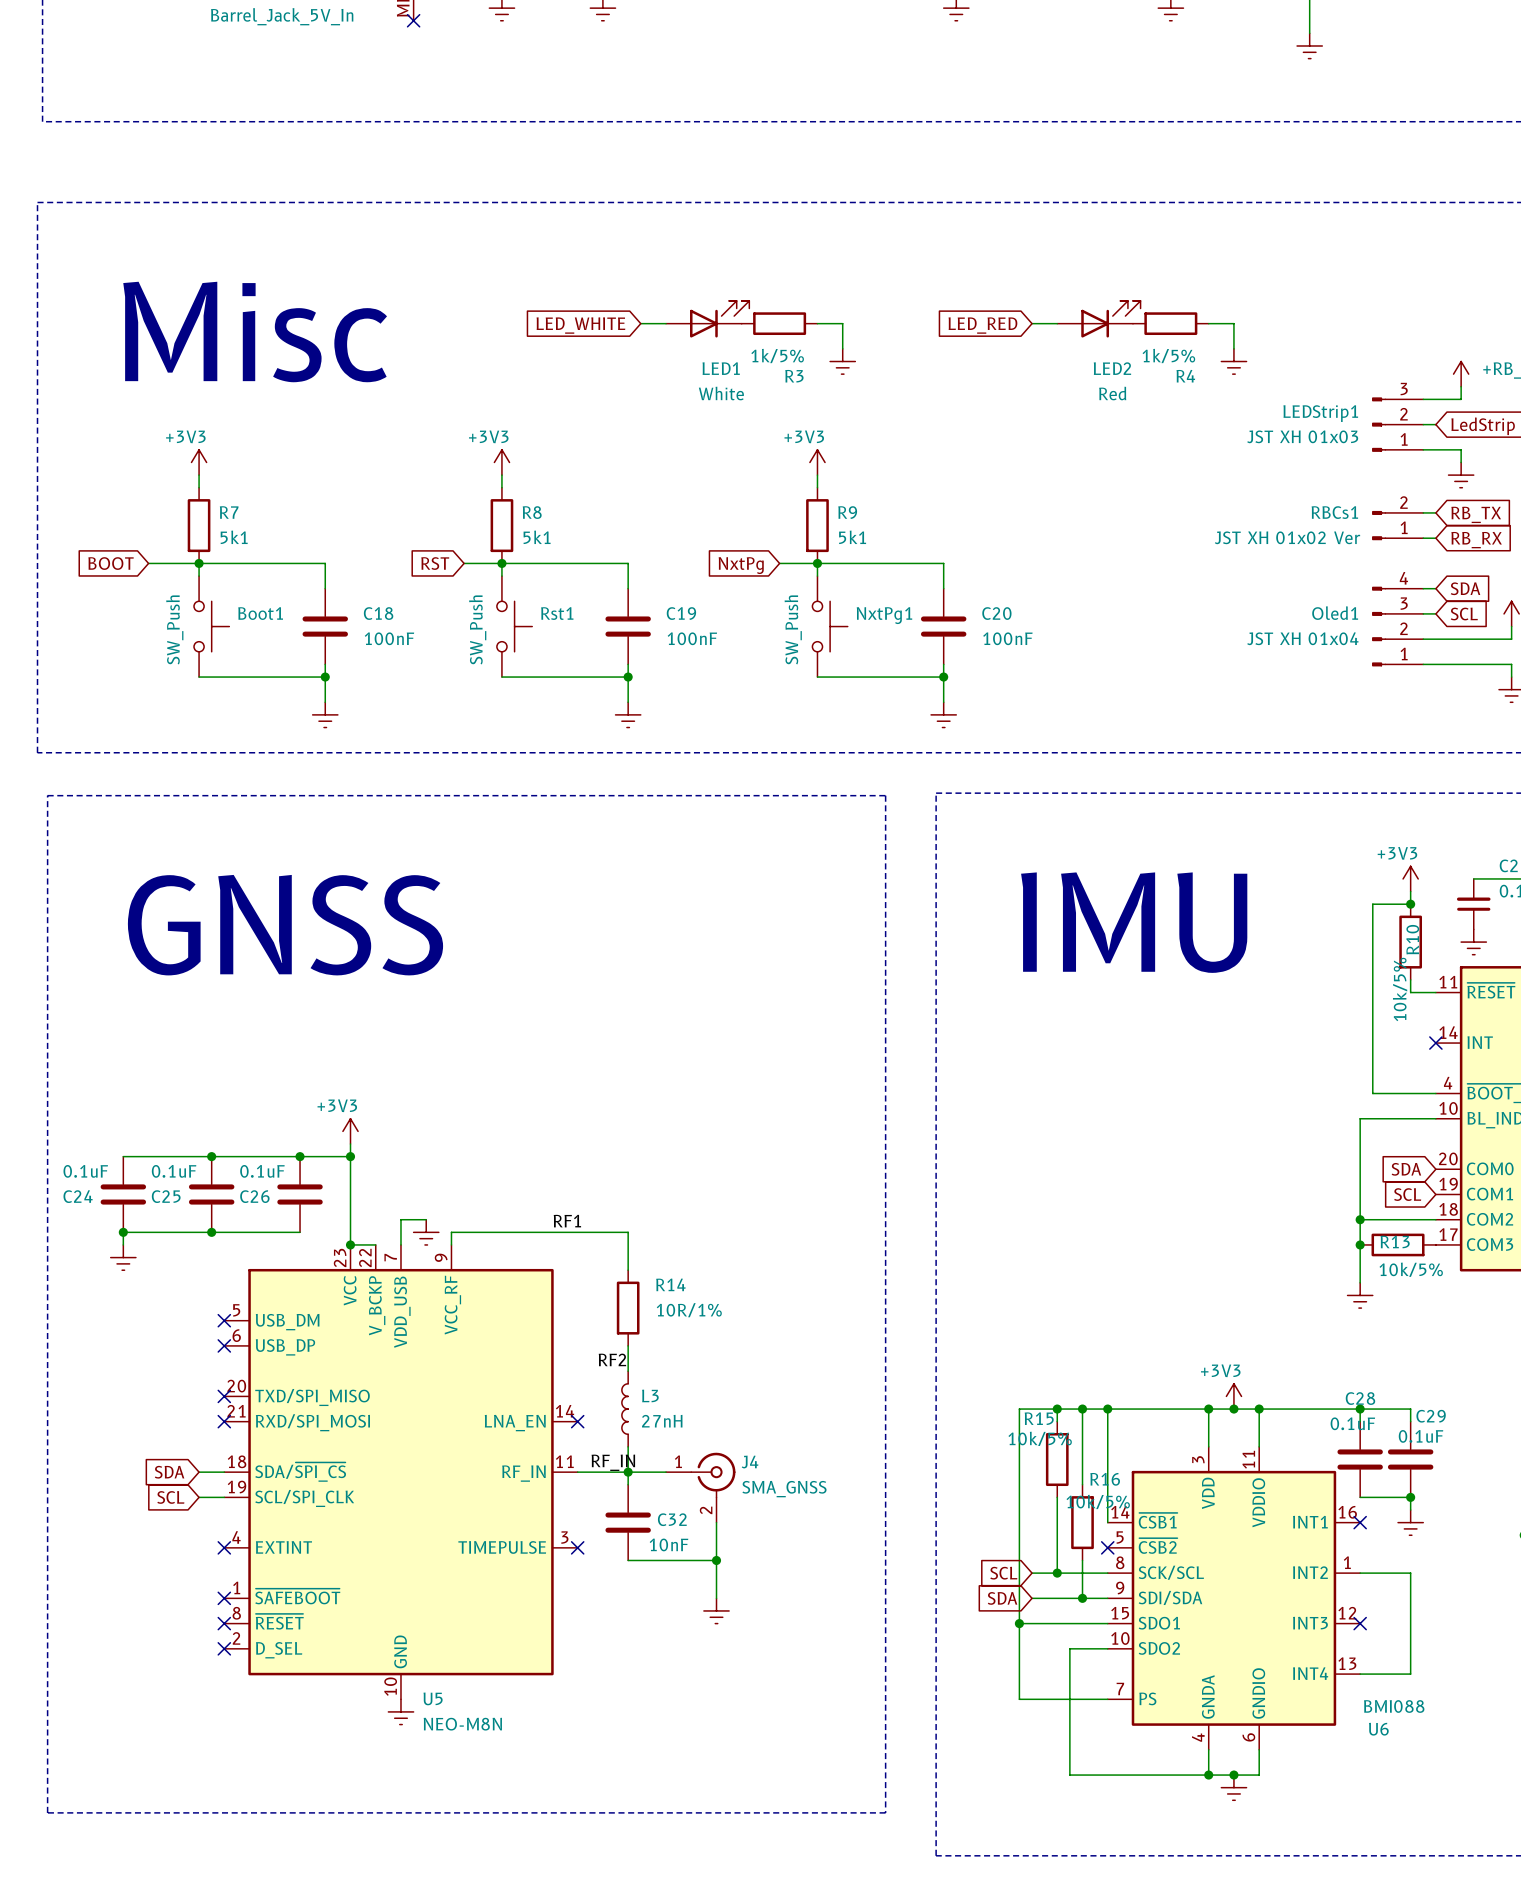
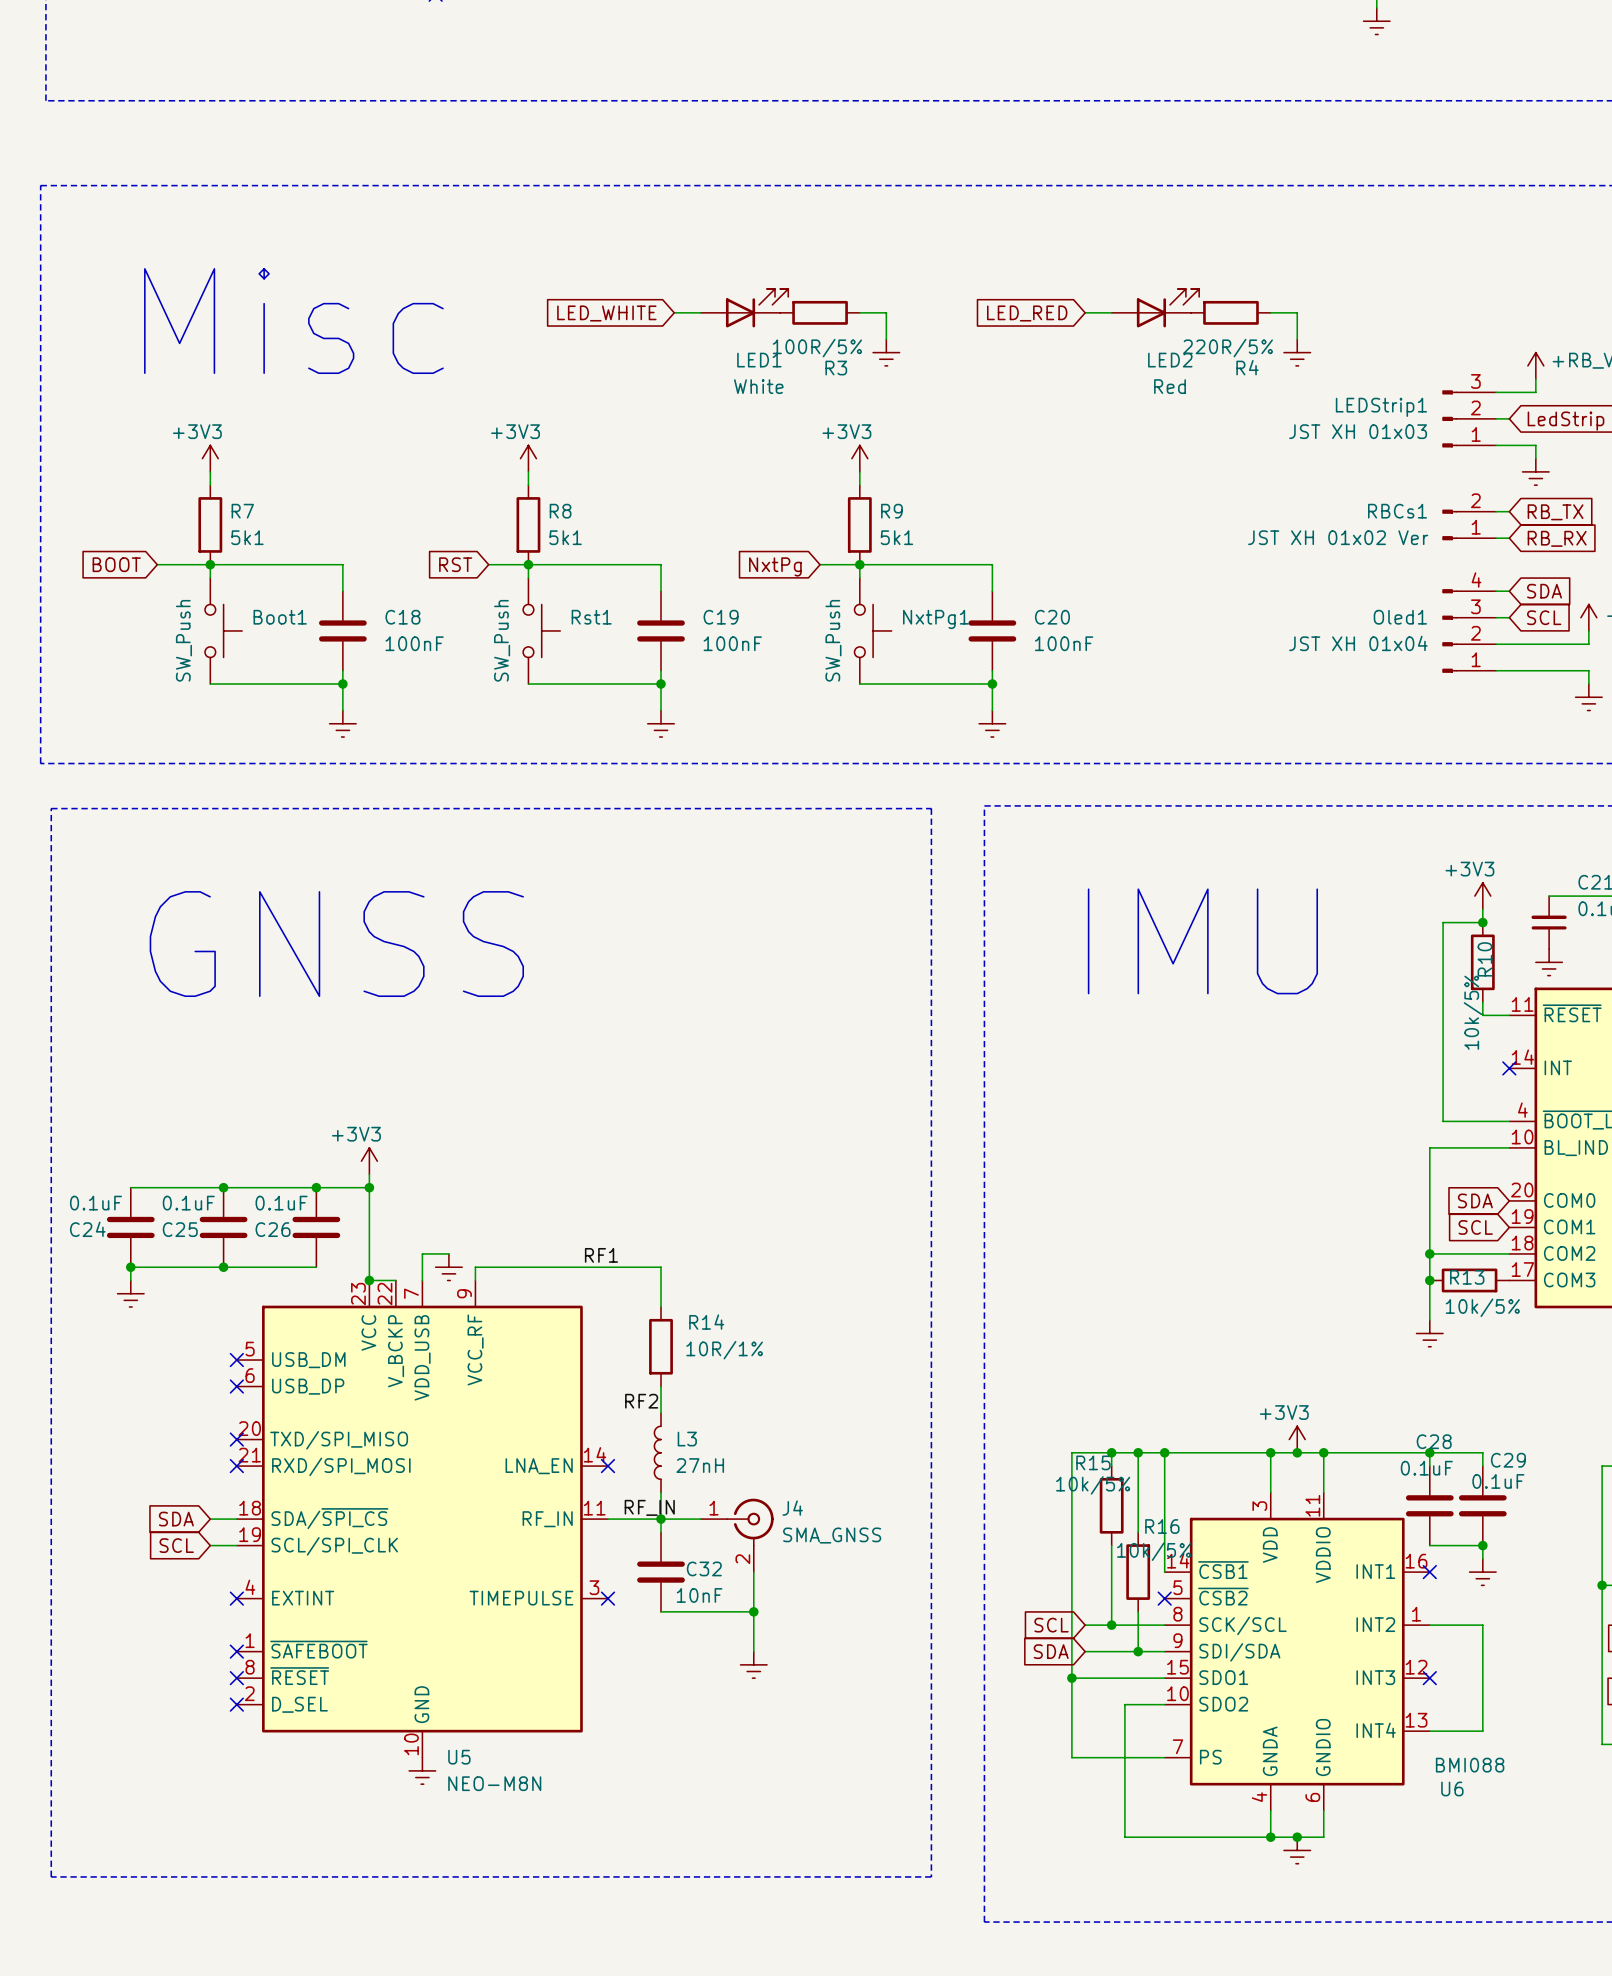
R3 value: 1k/5% (777, 355) -> 100R/5% (817, 348)
R4 value: 1k/5% (1168, 355) -> 220R/5% (1228, 348)

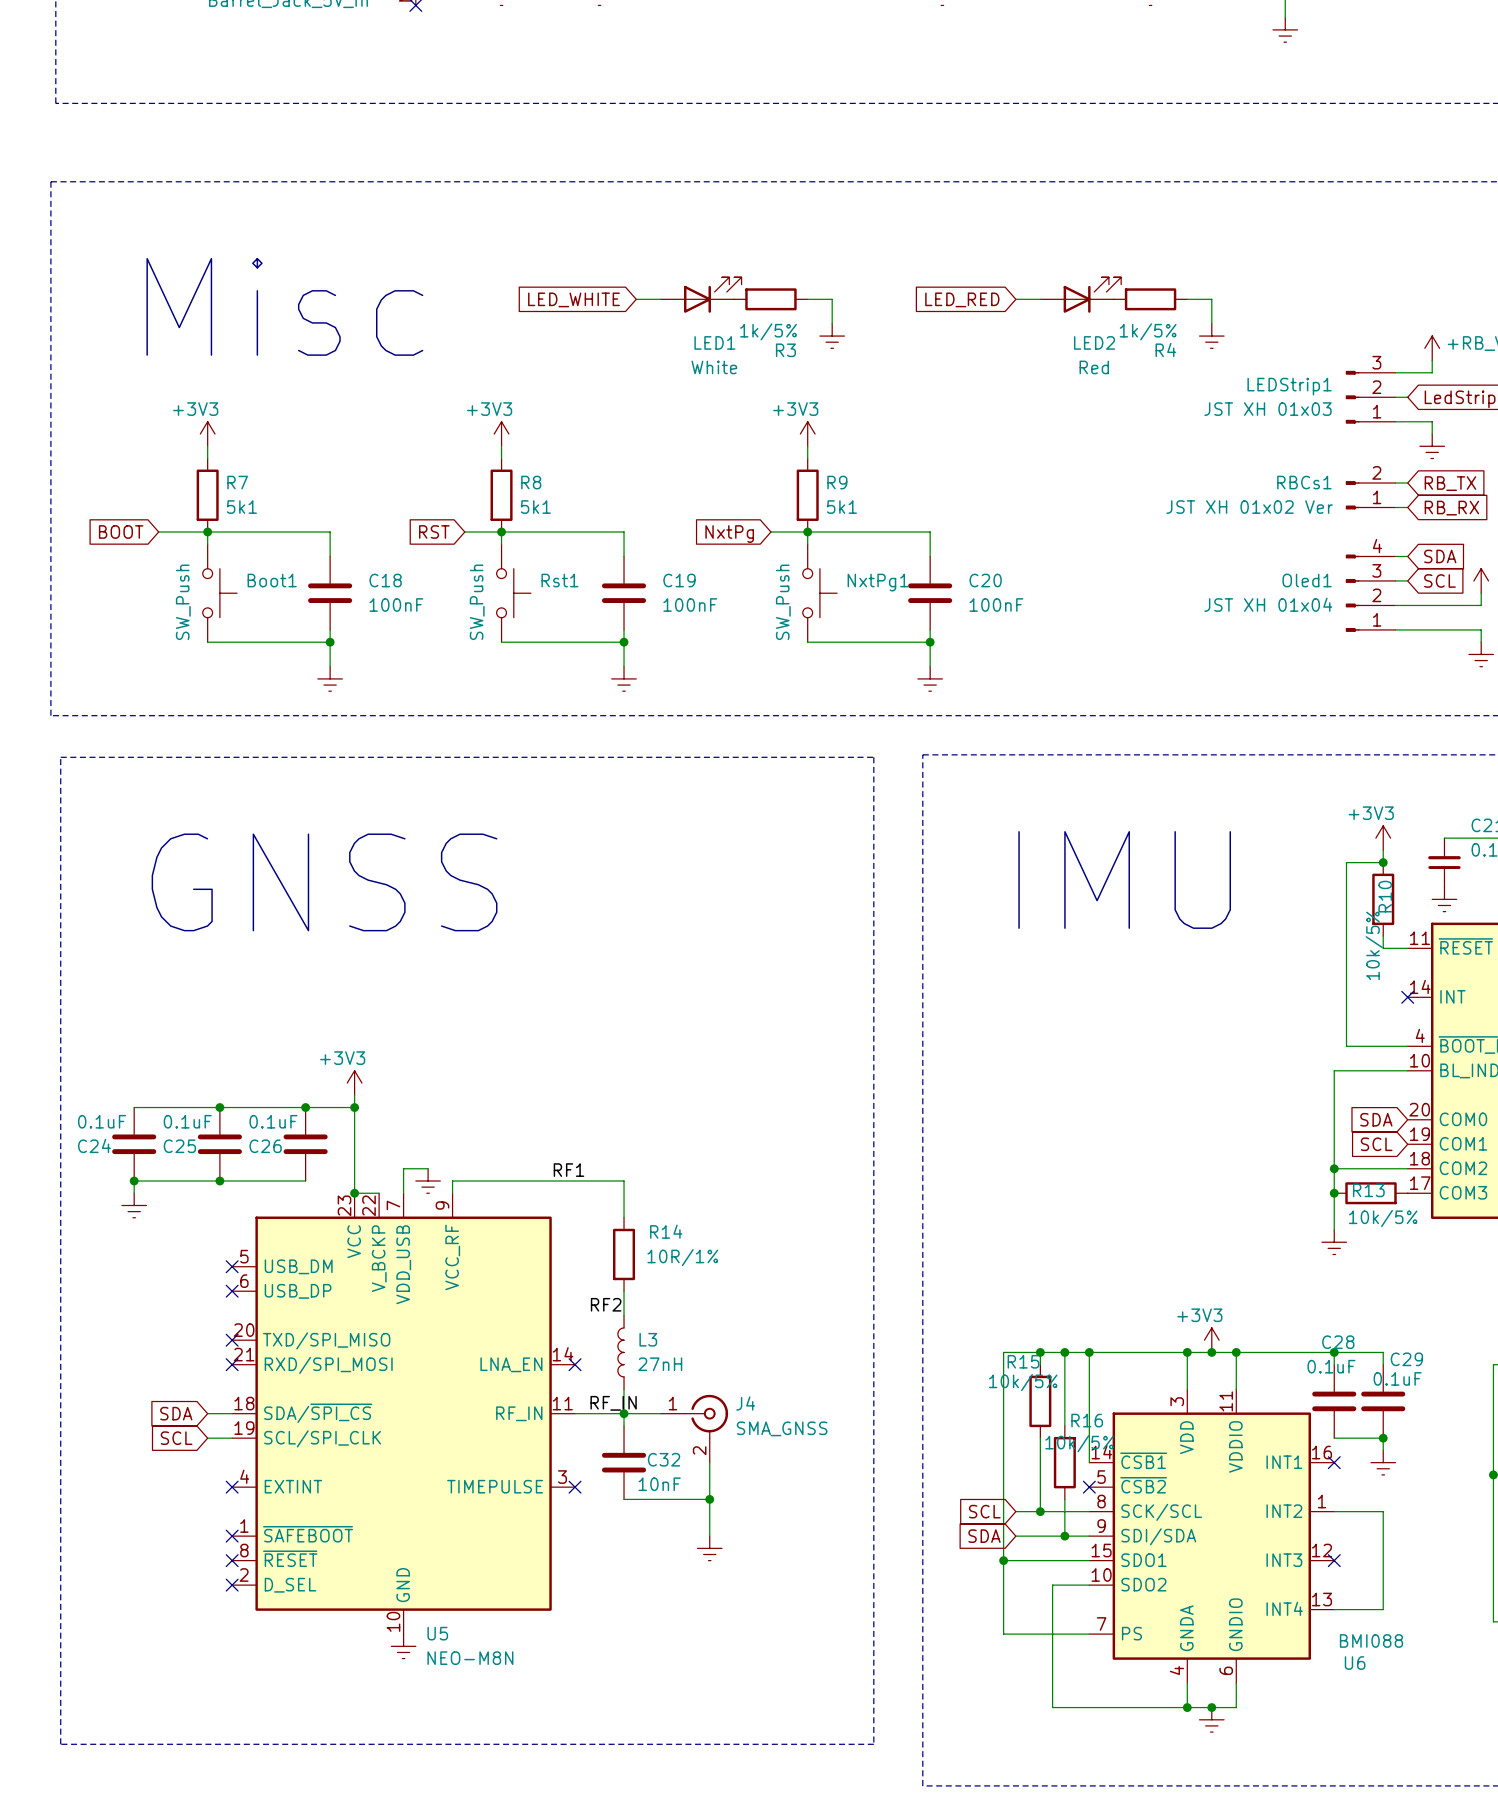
R3 value: 100R/5% (817, 348) -> 1k/5% (768, 331)
R4 value: 220R/5% (1228, 348) -> 1k/5% (1148, 331)

